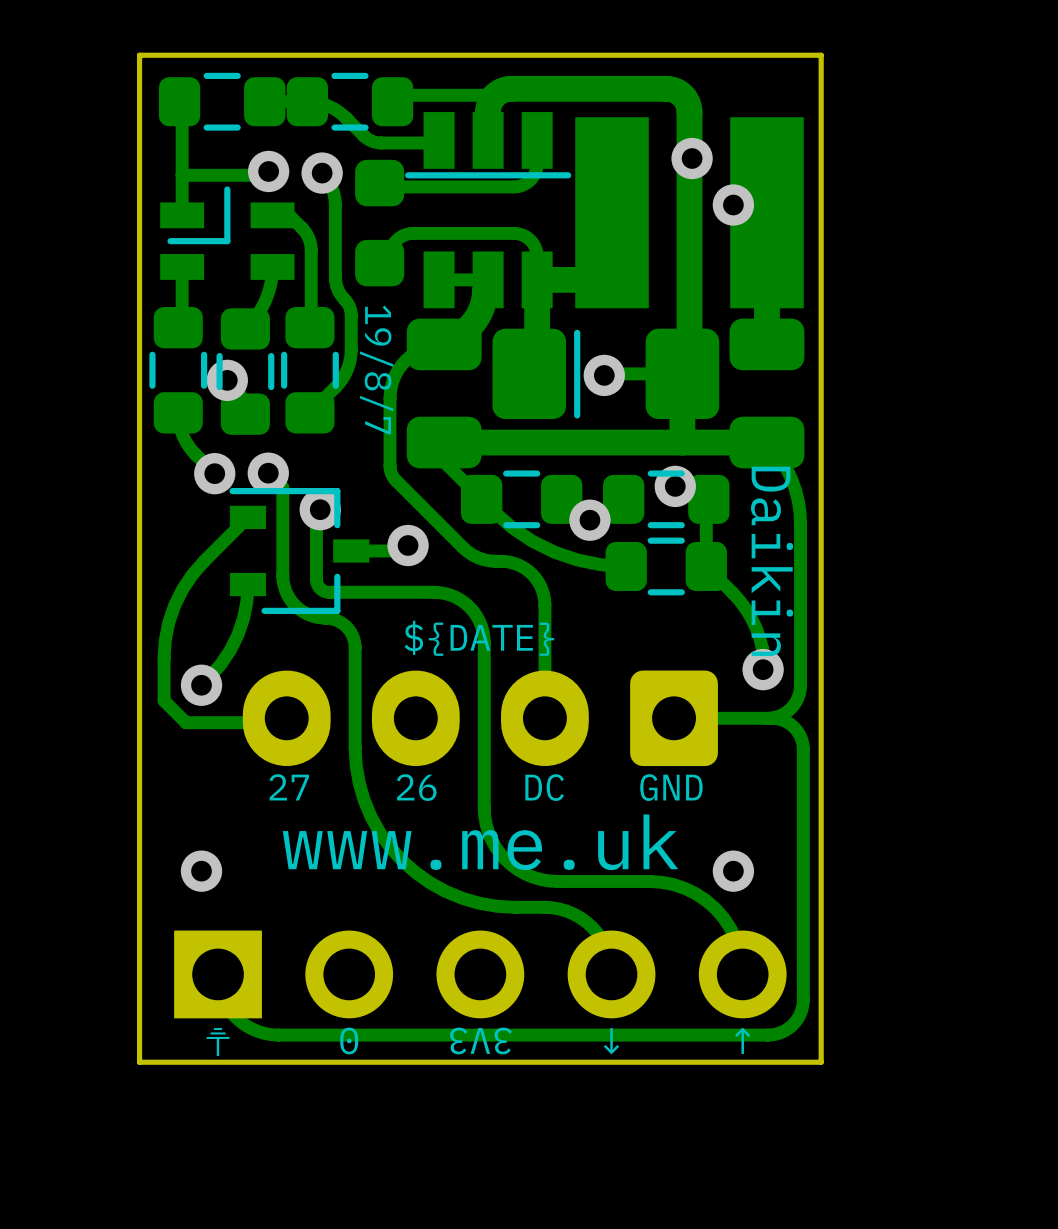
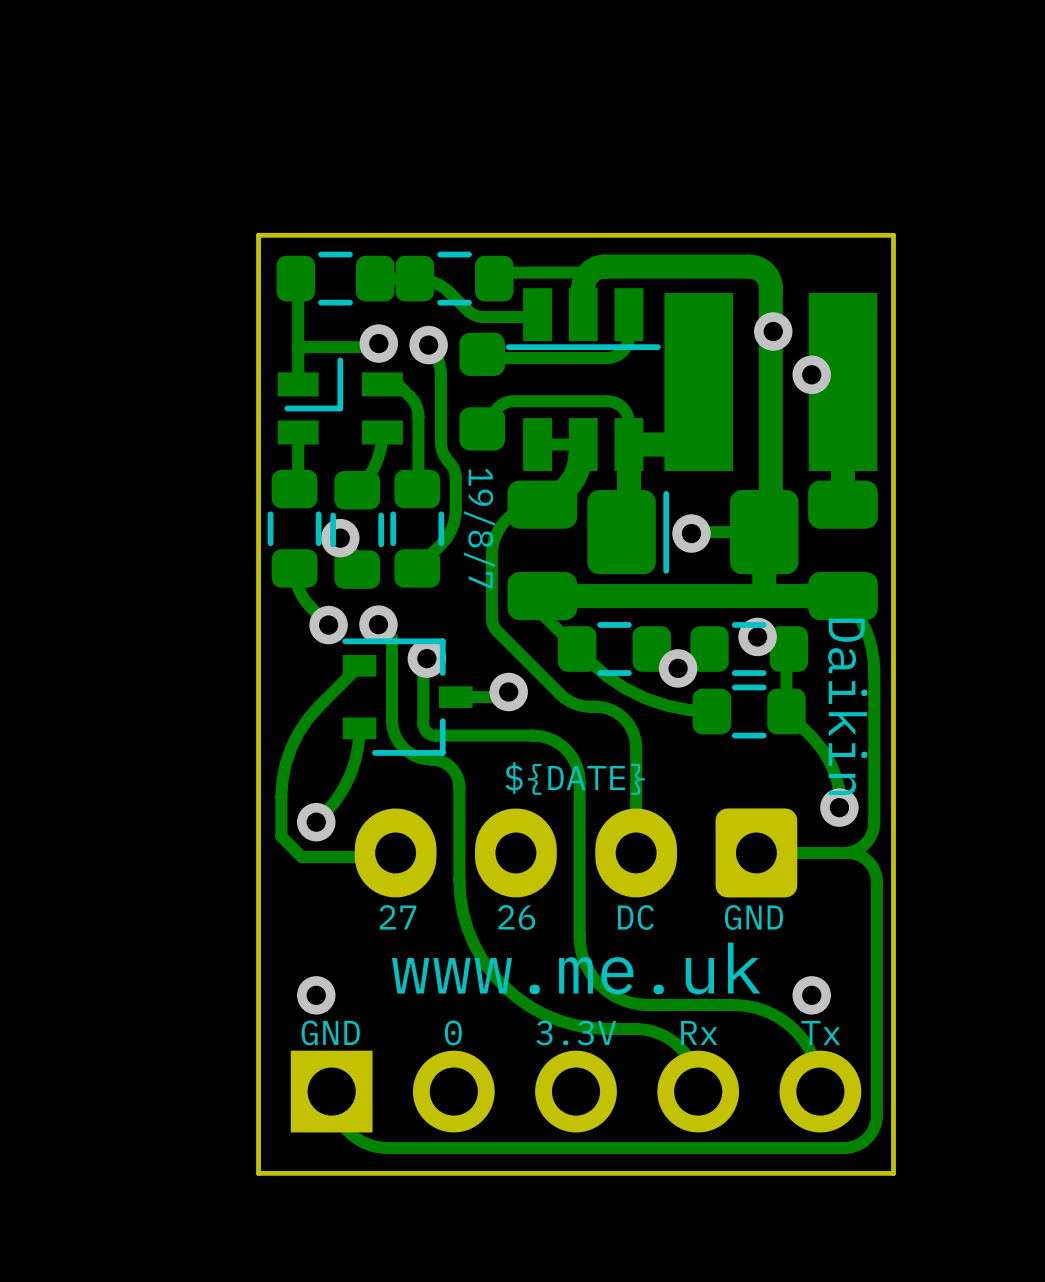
text: none -> GND (330, 1032)
text: none -> 0 (453, 1032)
text: none -> 3.3V (576, 1032)
text: none -> Rx (699, 1032)
text: none -> Tx (820, 1032)
part text: 0 (349, 1040) -> none
part text: 3V3 (481, 1040) -> none
part text: ↓ (742, 1040) -> none
part text: ↑ (611, 1041) -> none
part text: ⏚ (218, 1042) -> none

